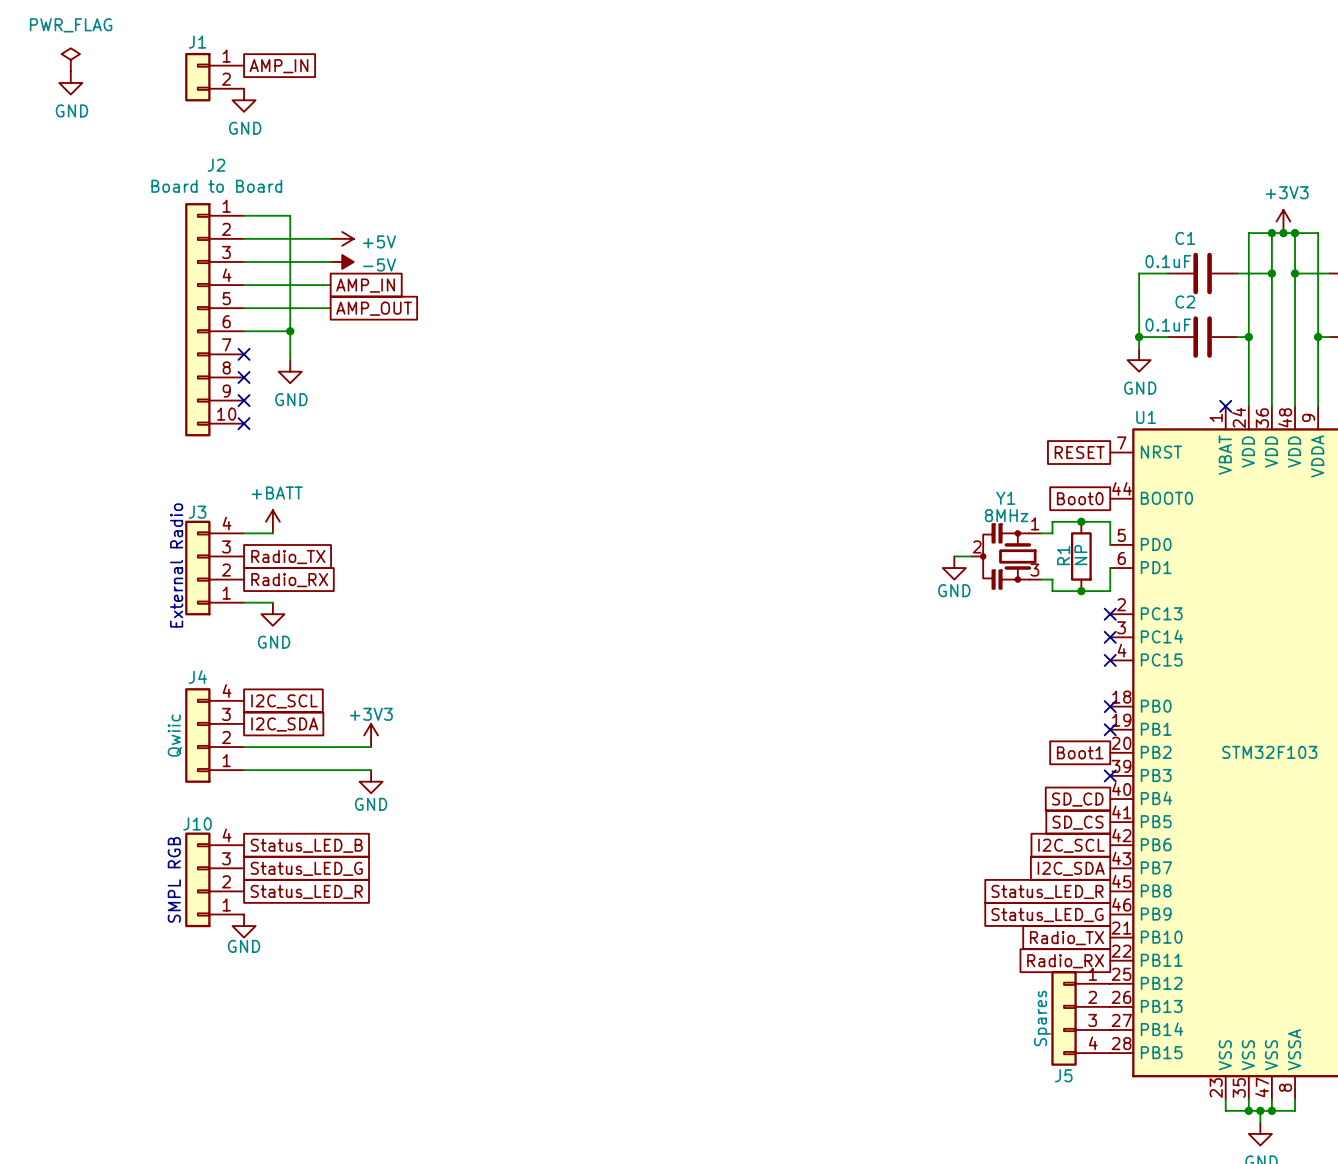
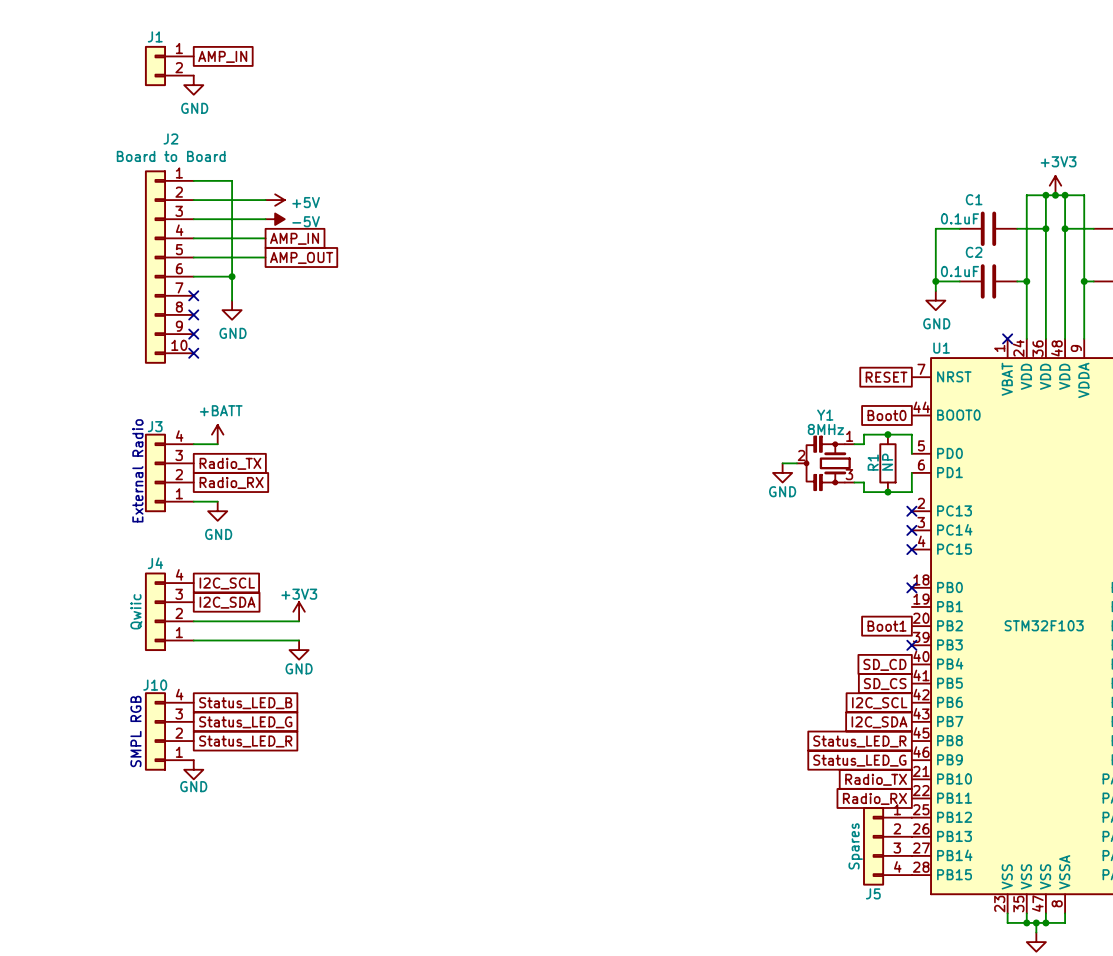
power symbol: PWR_FLAG (70, 59) -> none
power symbol: GND (70, 82) -> none
no-connect mark: (1110, 729) -> none

